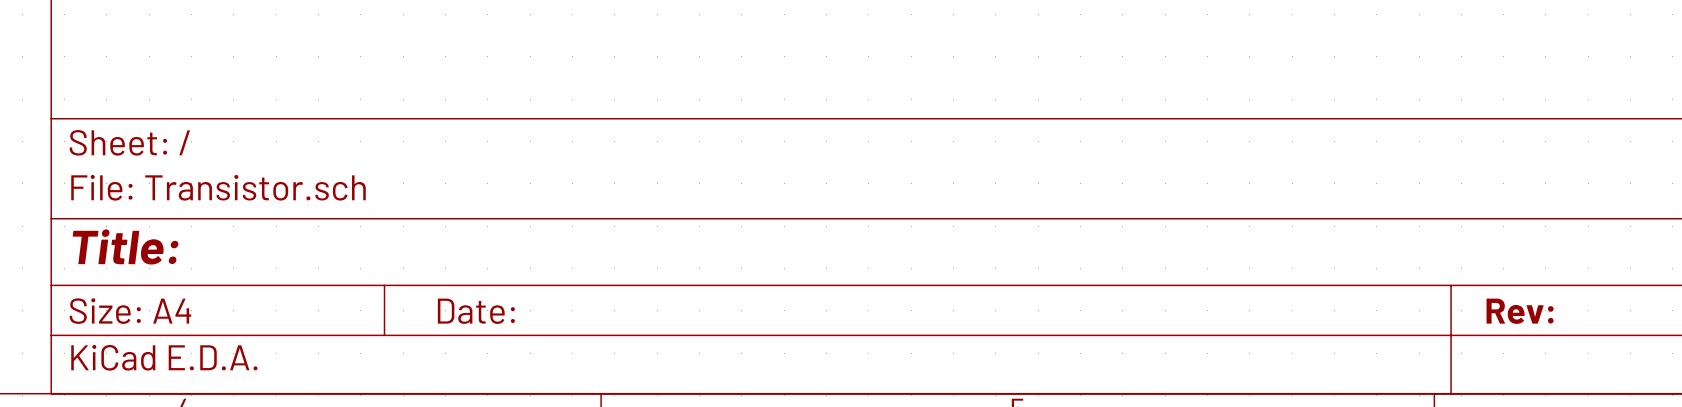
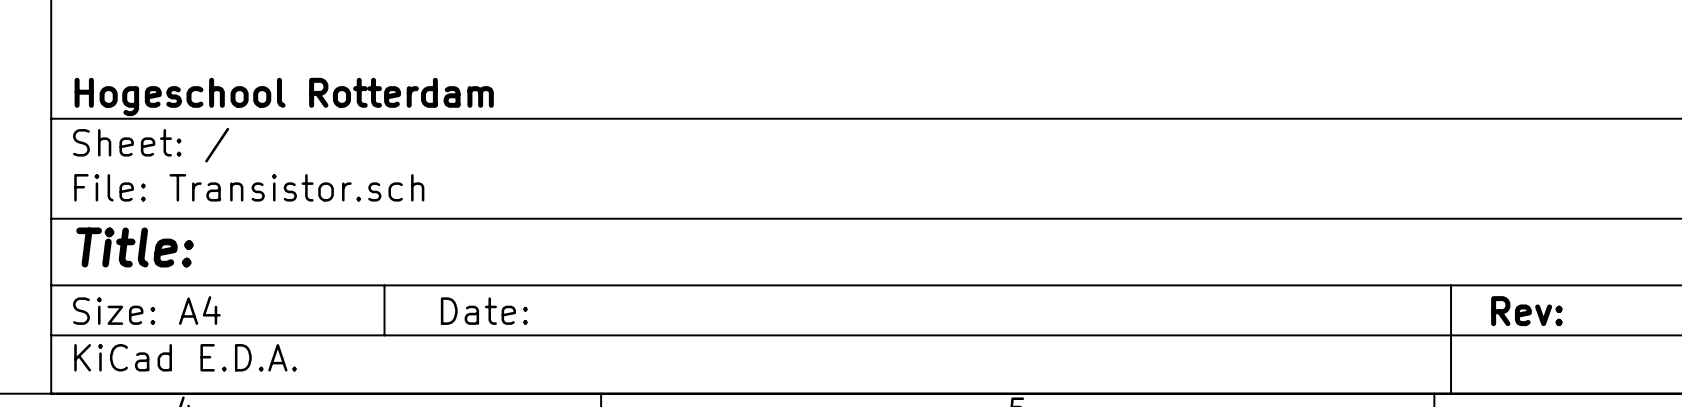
title block: none -> Hogeschool Rotterdam (284, 96)

